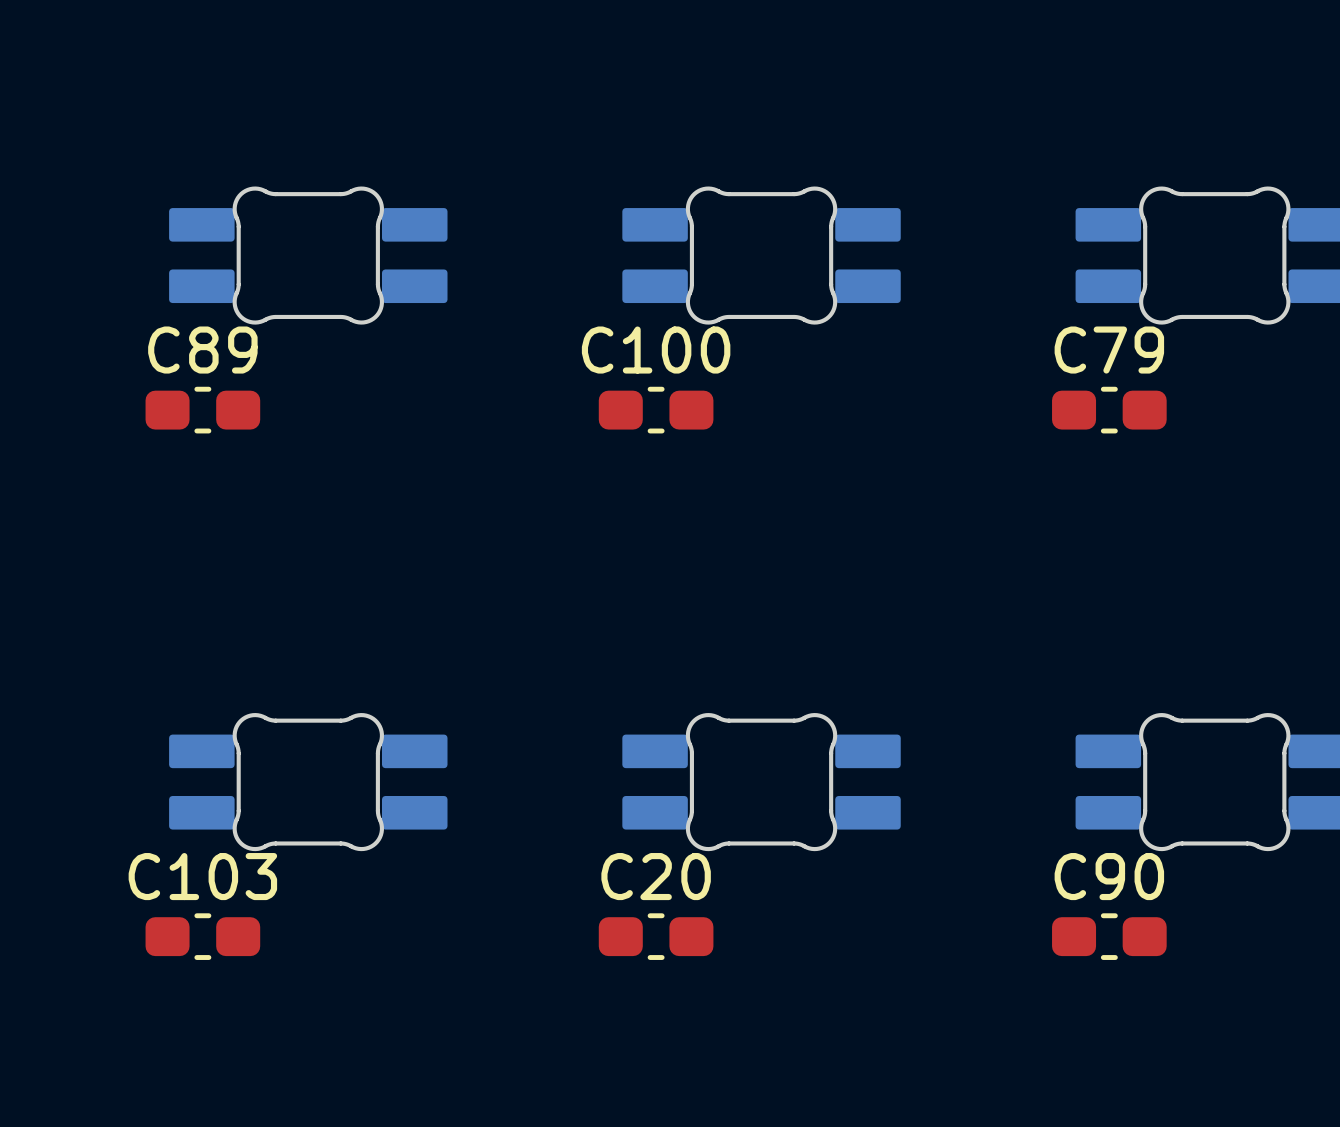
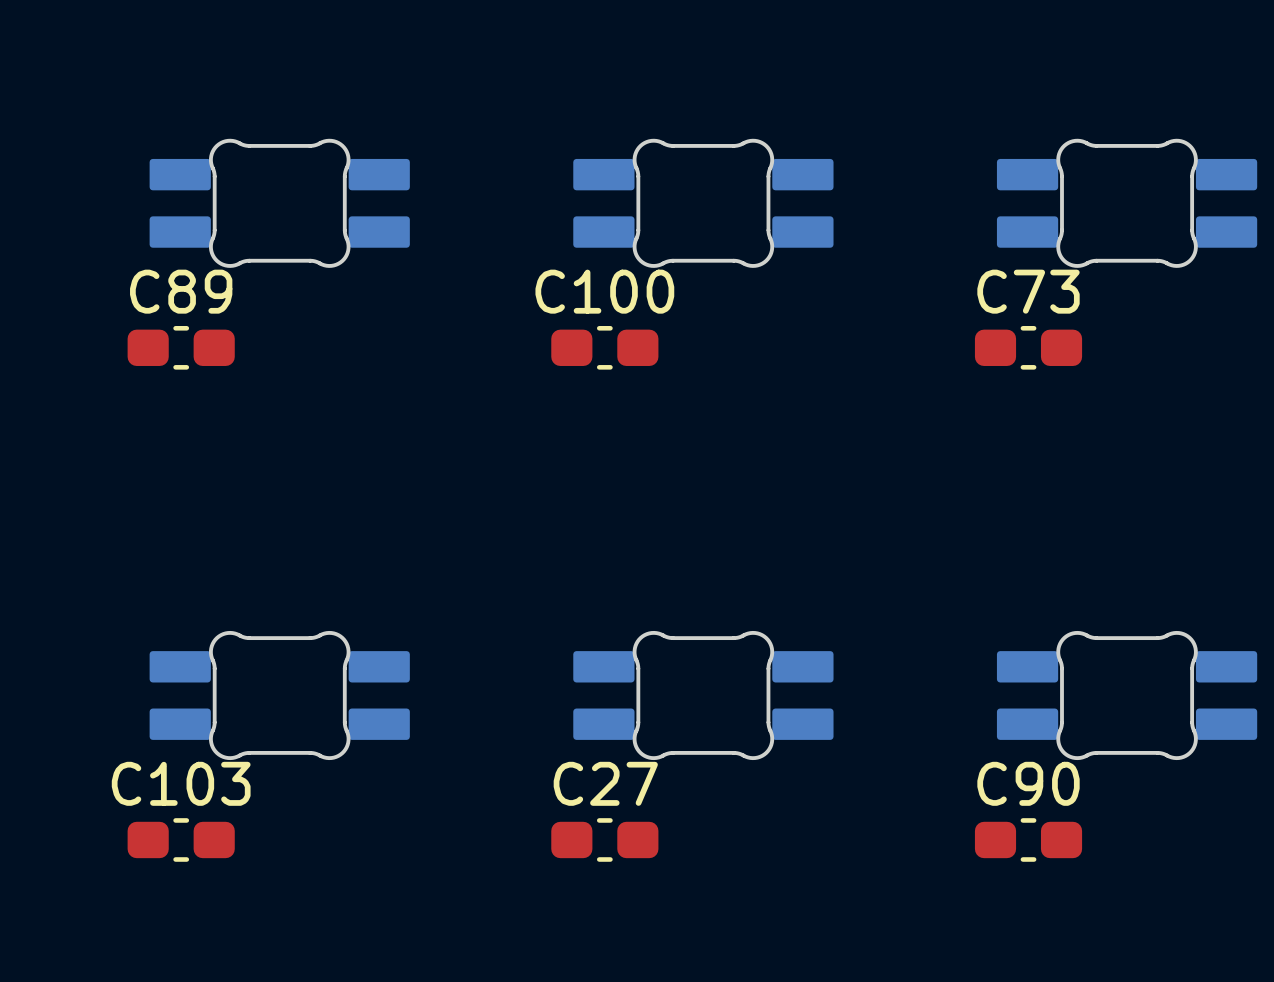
C79 name: C79 (1109, 350) -> C73 (1028, 291)
C20 name: C20 (656, 876) -> C27 (605, 783)

